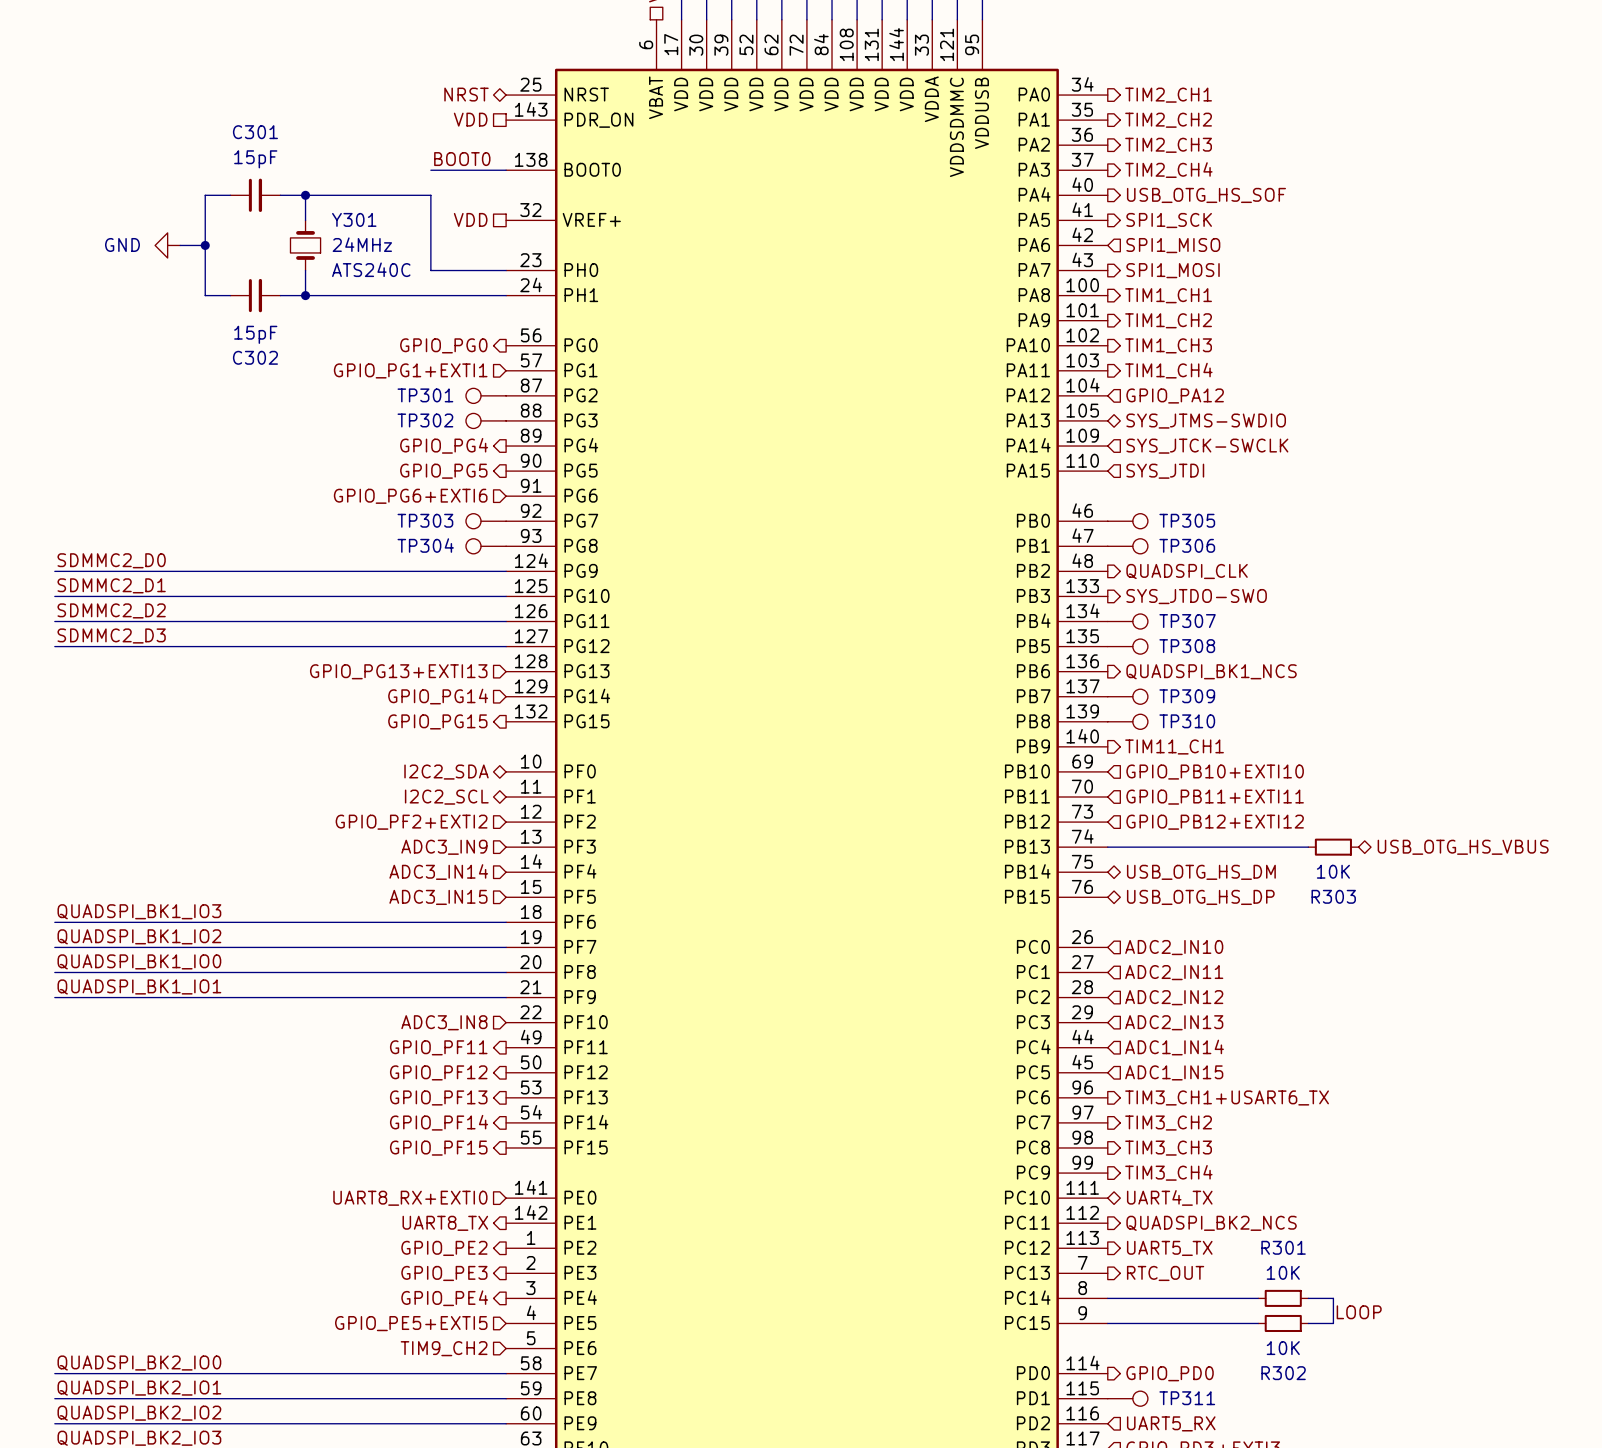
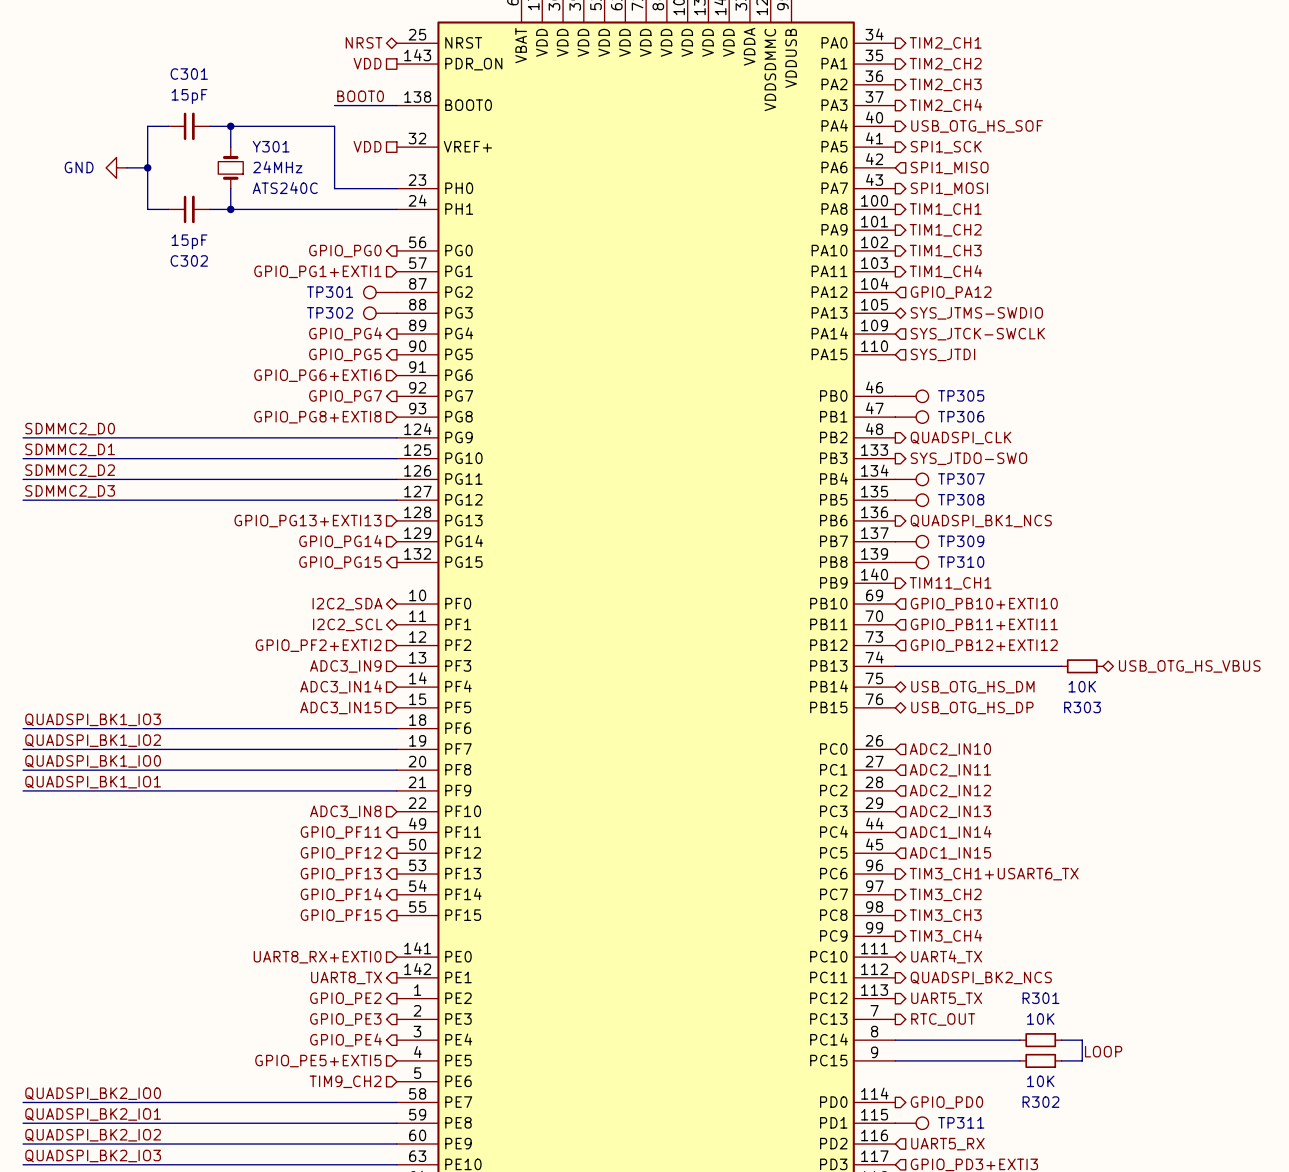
hierarchical label: none -> GPIO_PG7 (345, 396)
TP303: (486, 521) -> none
hierarchical label: none -> GPIO_PG8+EXTI8 (317, 417)
TP304: (486, 546) -> none

